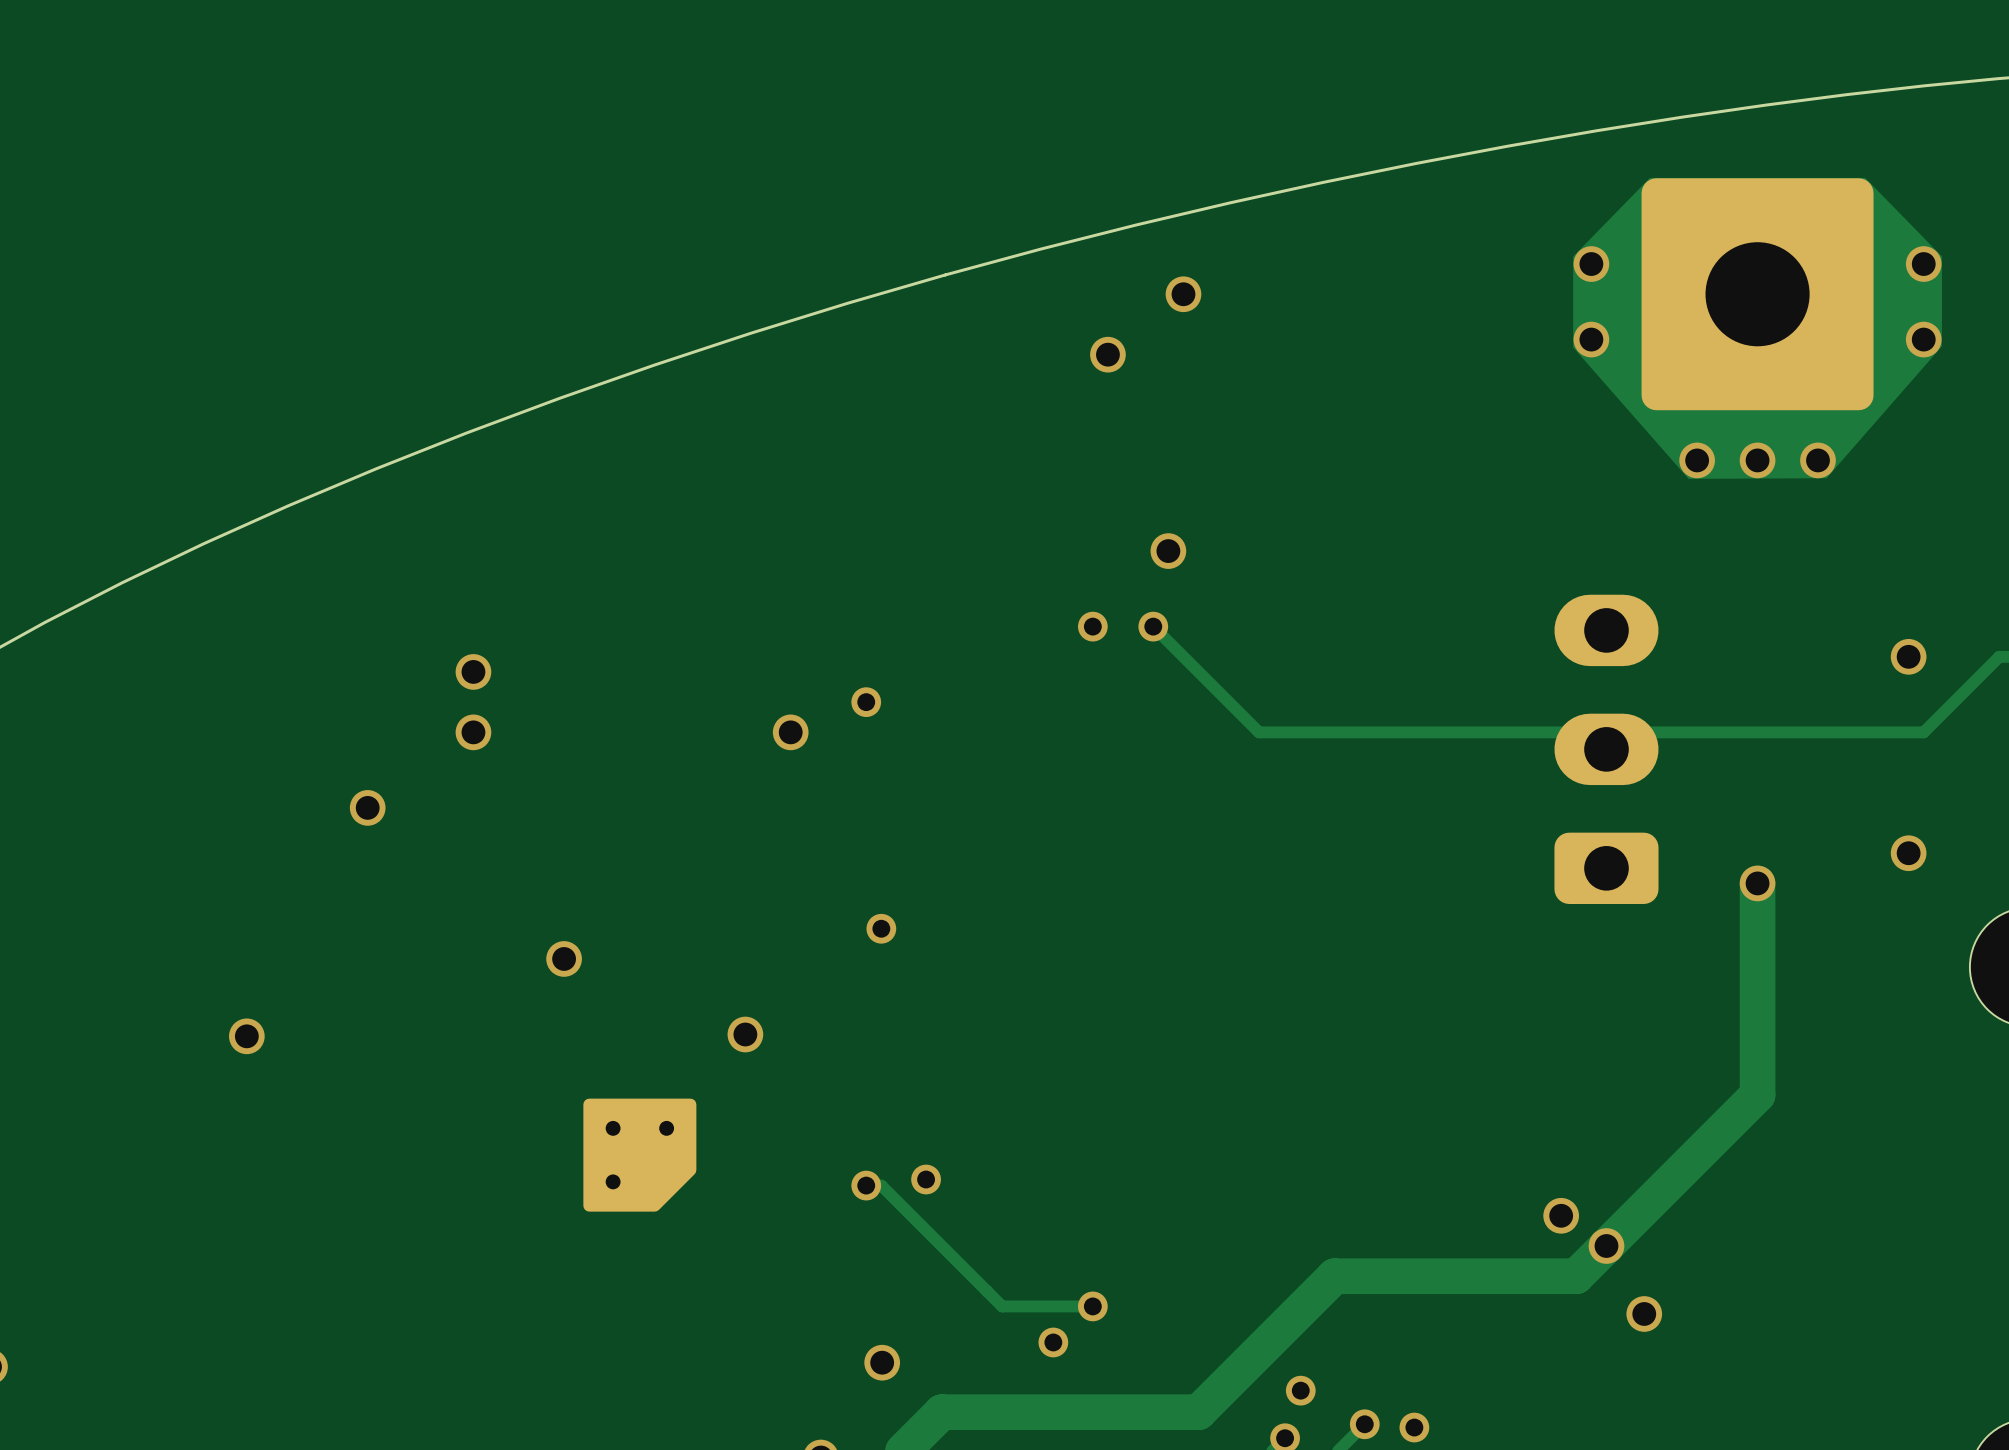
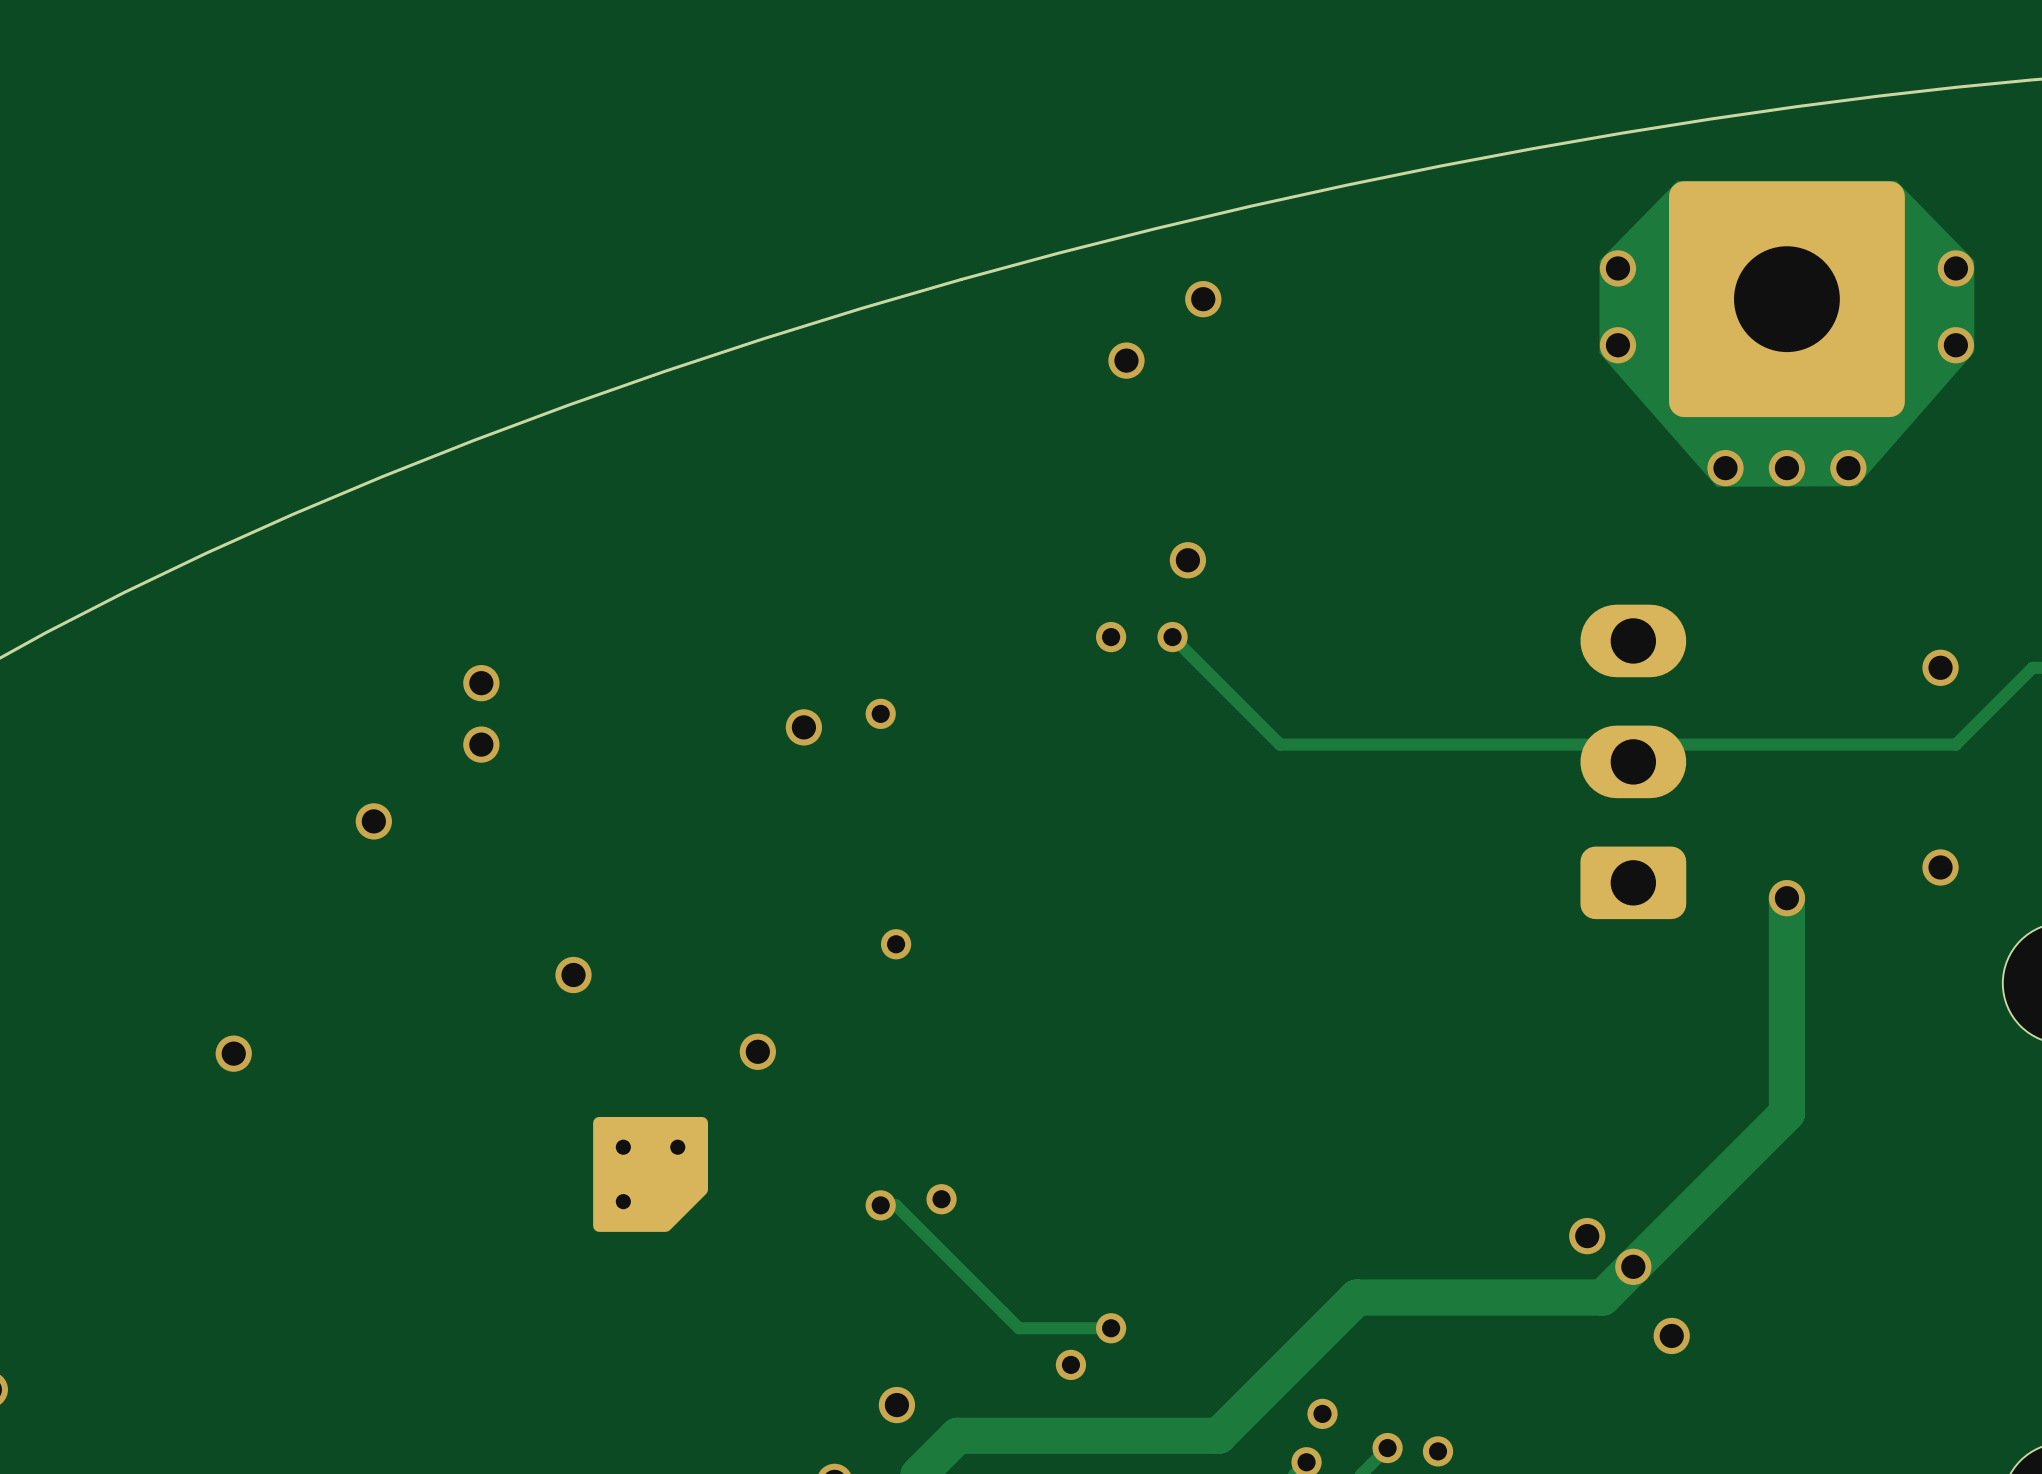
via position: (790, 732) -> (803, 727)
via position: (246, 1036) -> (233, 1053)
via position: (882, 1362) -> (896, 1405)

